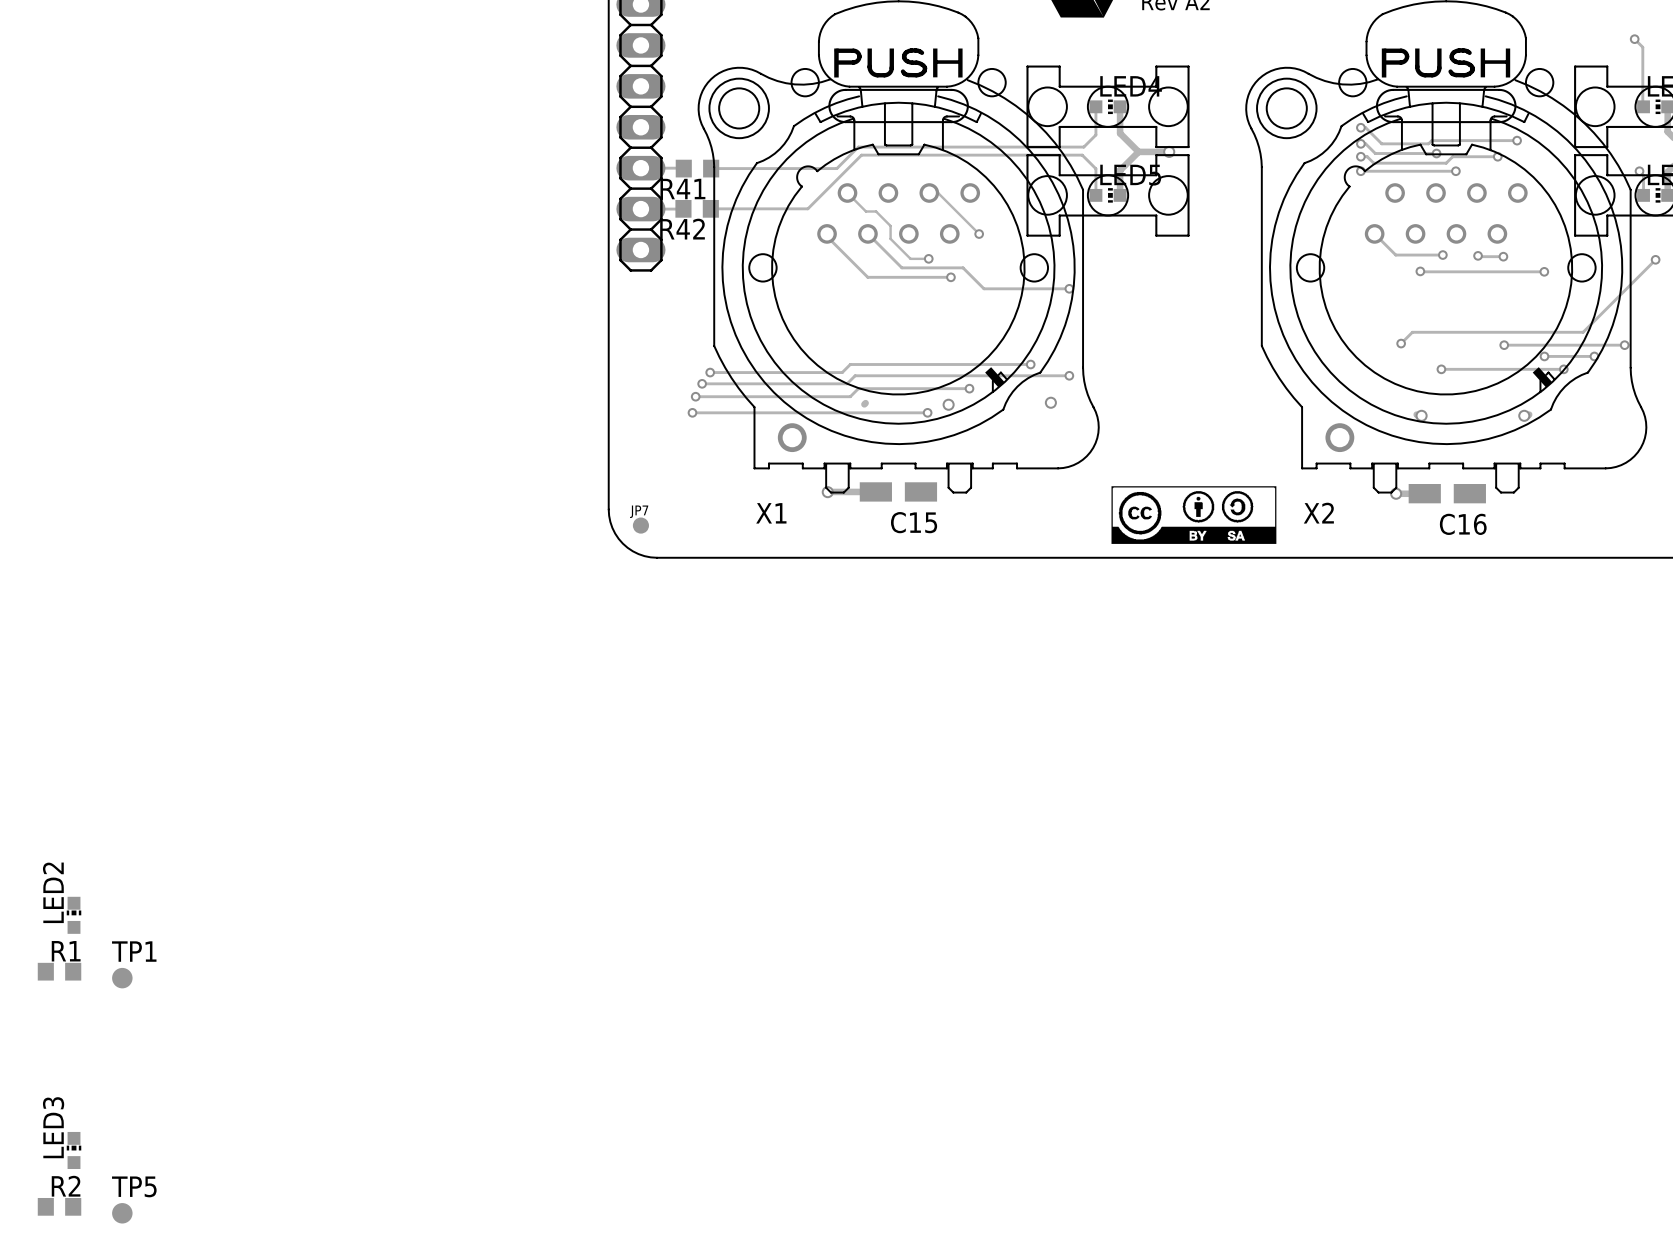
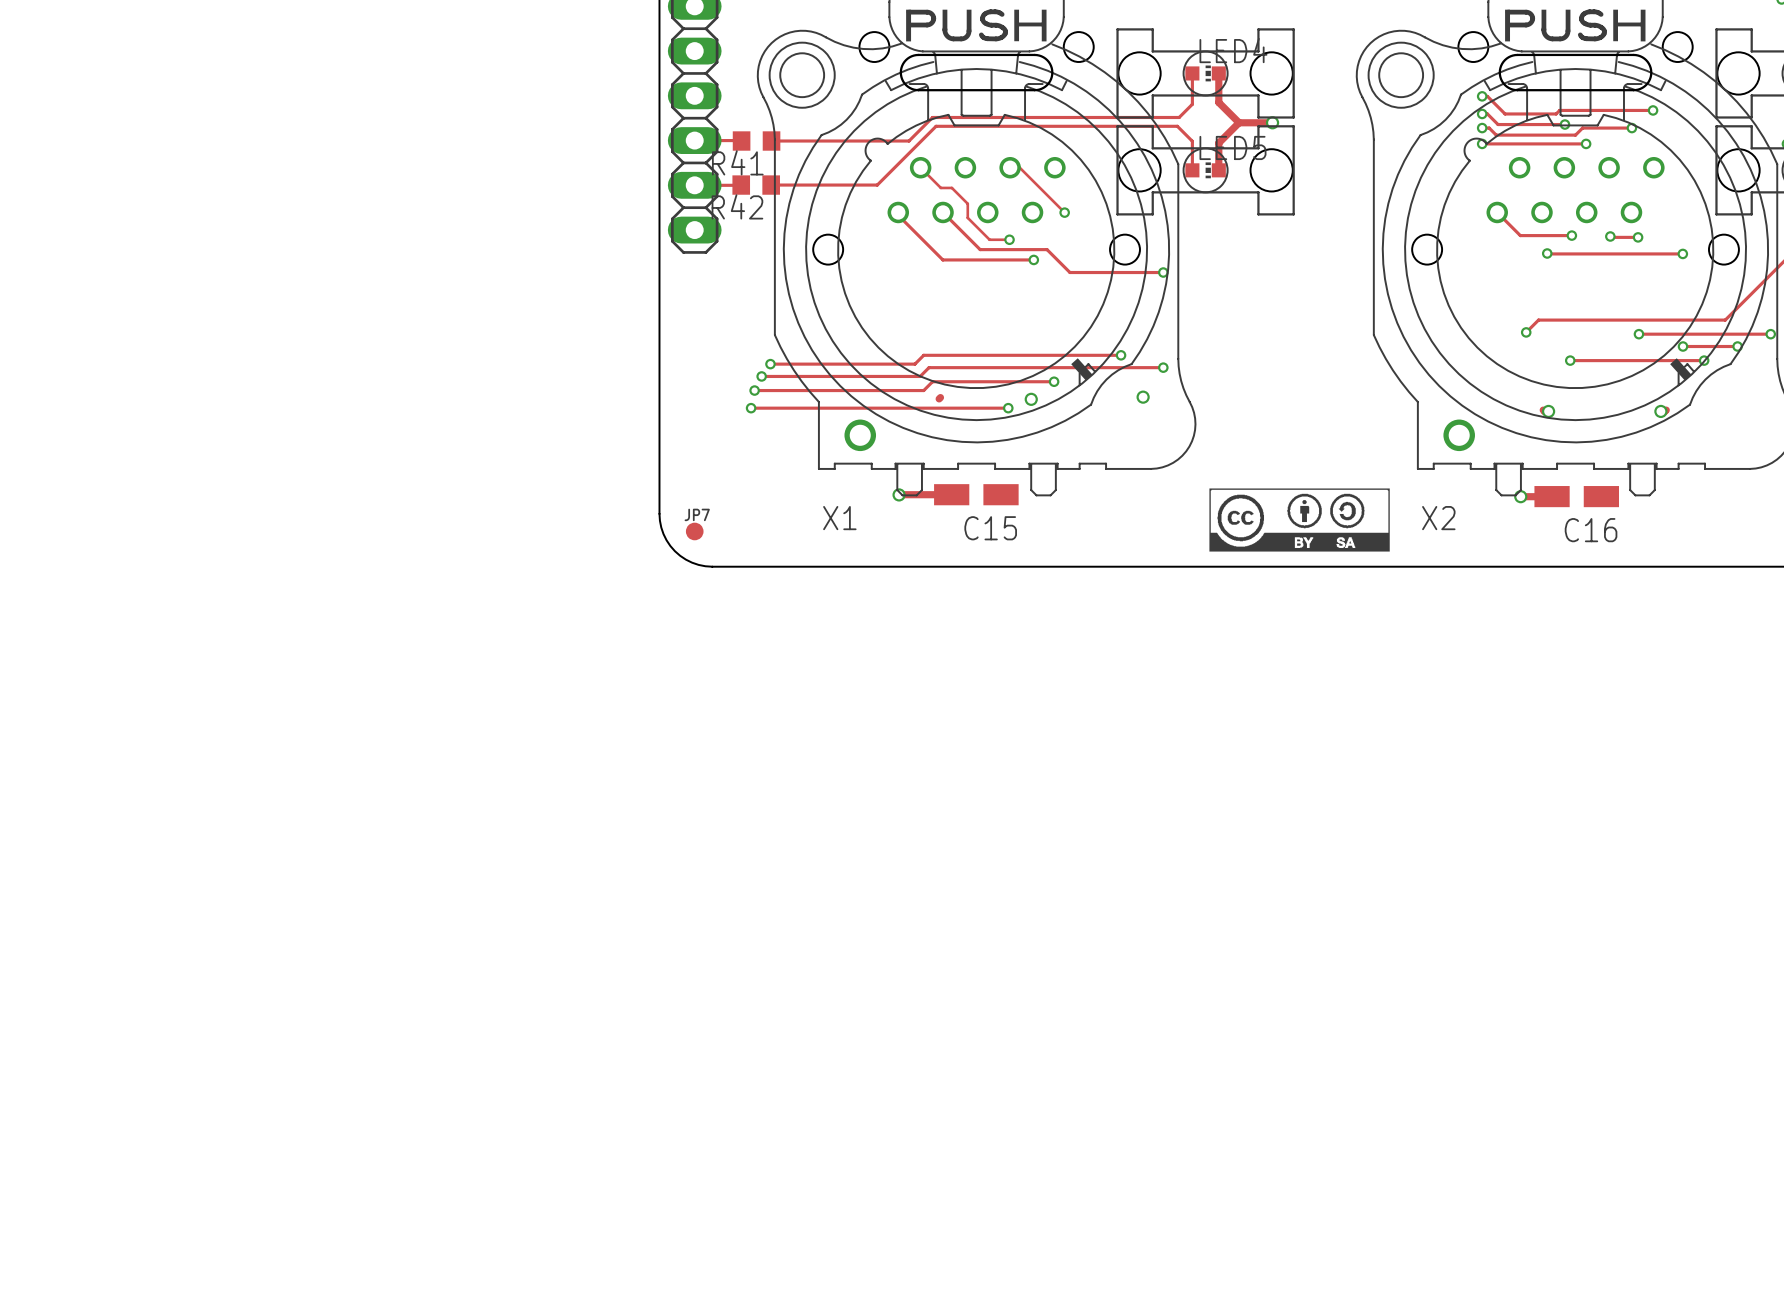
LED2: (74, 915) -> none
R1: (59, 971) -> none
TP1: (122, 978) -> none
LED3: (74, 1150) -> none
R2: (59, 1206) -> none
TP5: (122, 1213) -> none

